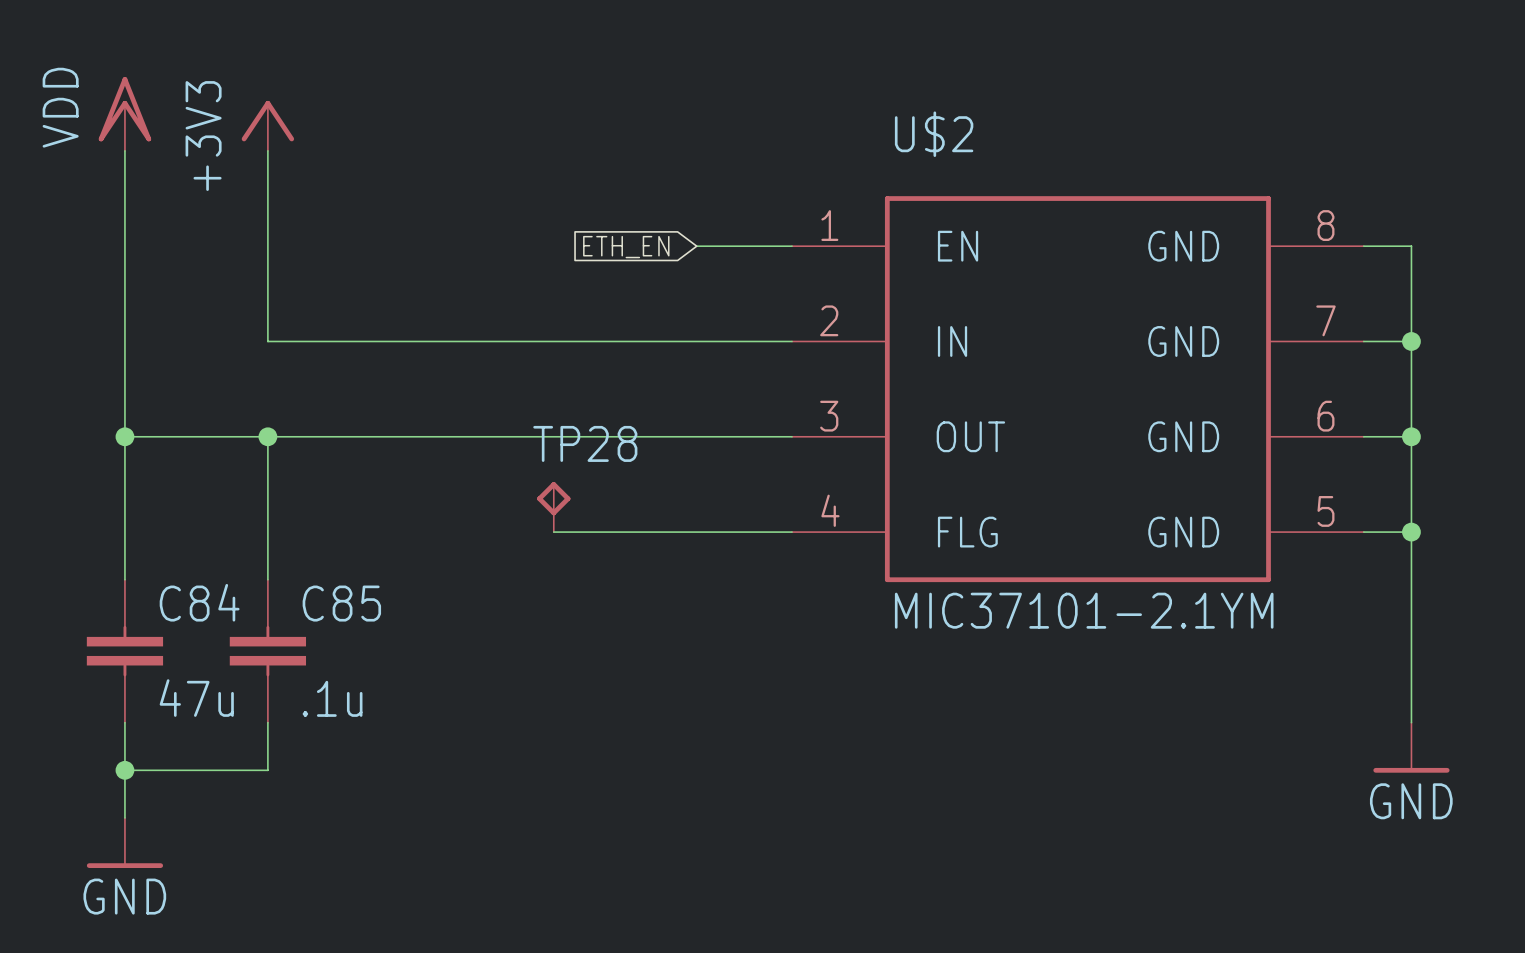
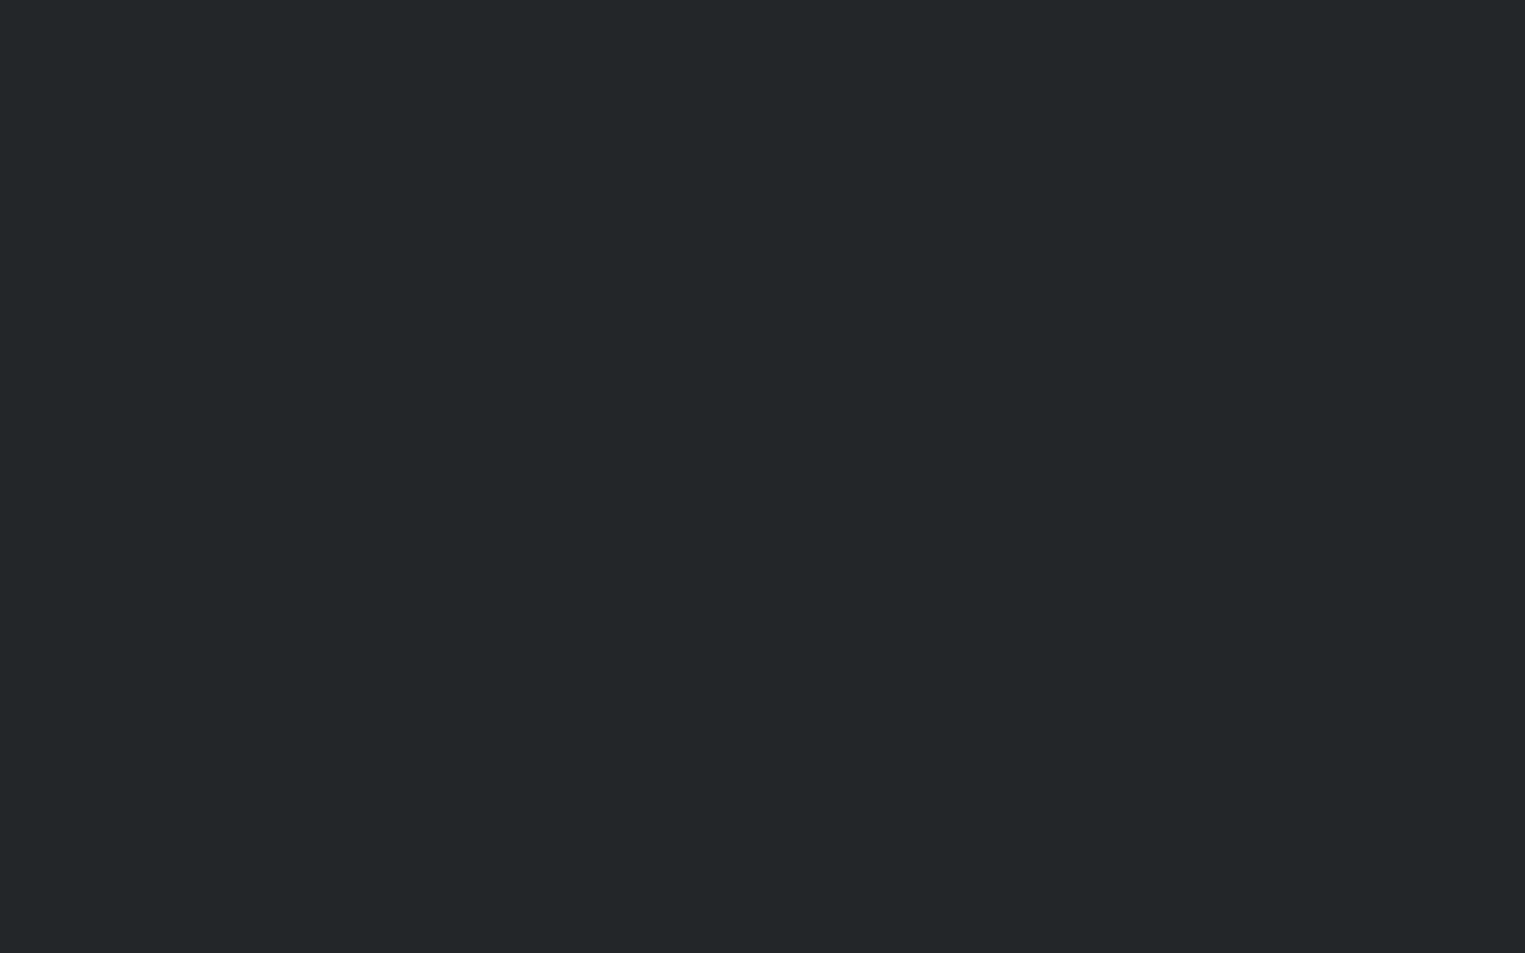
power symbol: VDD (124, 113) -> none
power symbol: +3V3 (267, 125) -> none
wire: (124, 150) (124, 579) -> none
wire: (267, 150) (267, 341) (792, 341) -> none
wire: (696, 246) (792, 246) -> none
wire: (1363, 246) (1411, 246) (1411, 722) -> none
global label: ETH_EN (626, 247) -> none
wire: (1363, 341) (1411, 341) -> none
junction: (1411, 341) -> none
U$2: MIC37101-2.1YM (1077, 389) -> none
wire: (124, 436) (792, 436) -> none
junction: (124, 436) -> none
wire: (267, 436) (267, 579) -> none
junction: (267, 436) -> none
wire: (1363, 436) (1411, 436) -> none
junction: (1411, 436) -> none
TP28: (553, 507) -> none
wire: (553, 532) (792, 532) -> none
wire: (1363, 532) (1411, 532) -> none
junction: (1411, 532) -> none
C84: 47u (124, 651) -> none
C85: .1u (267, 651) -> none
wire: (124, 722) (124, 817) -> none
wire: (267, 722) (267, 770) (124, 770) -> none
power symbol: GND (1411, 747) -> none
junction: (124, 770) -> none
power symbol: GND (124, 842) -> none

